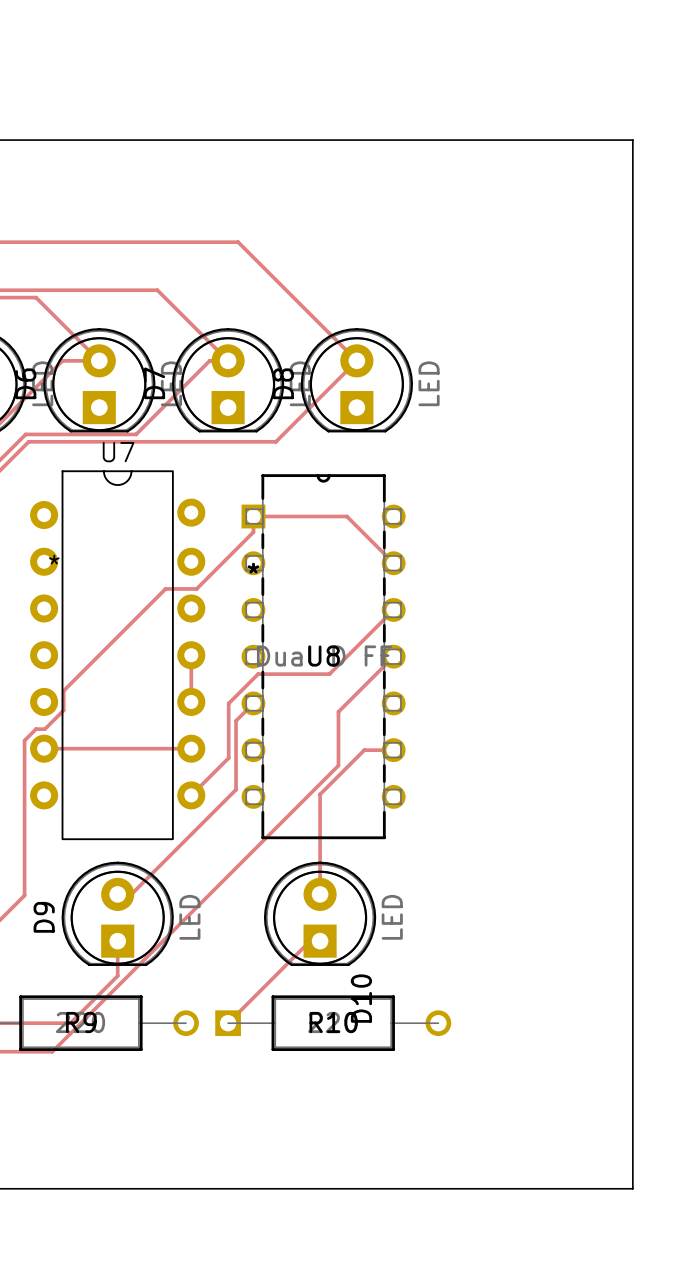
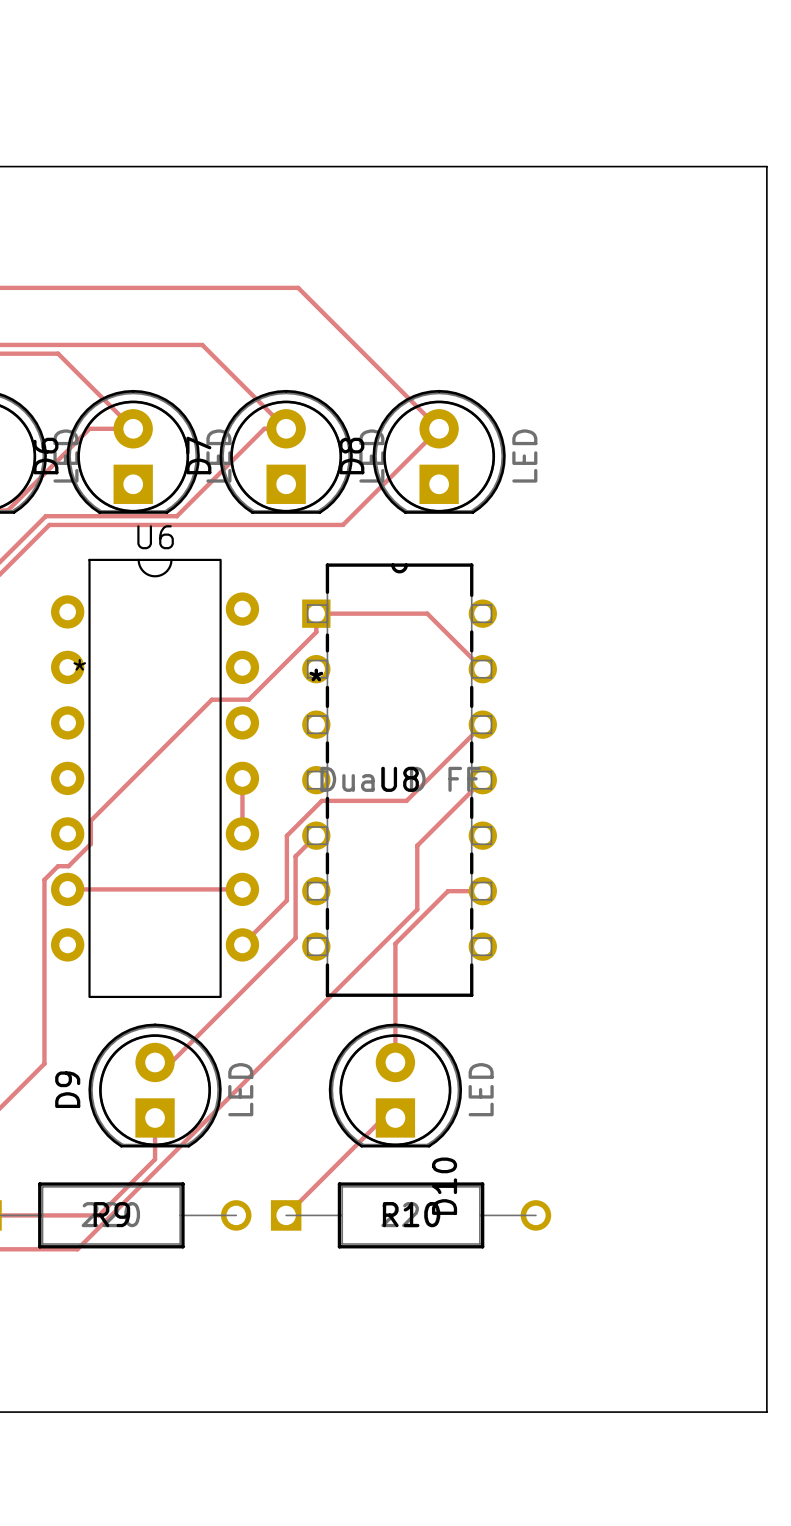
U7 name: U7 (118, 452) -> U6 (155, 537)

